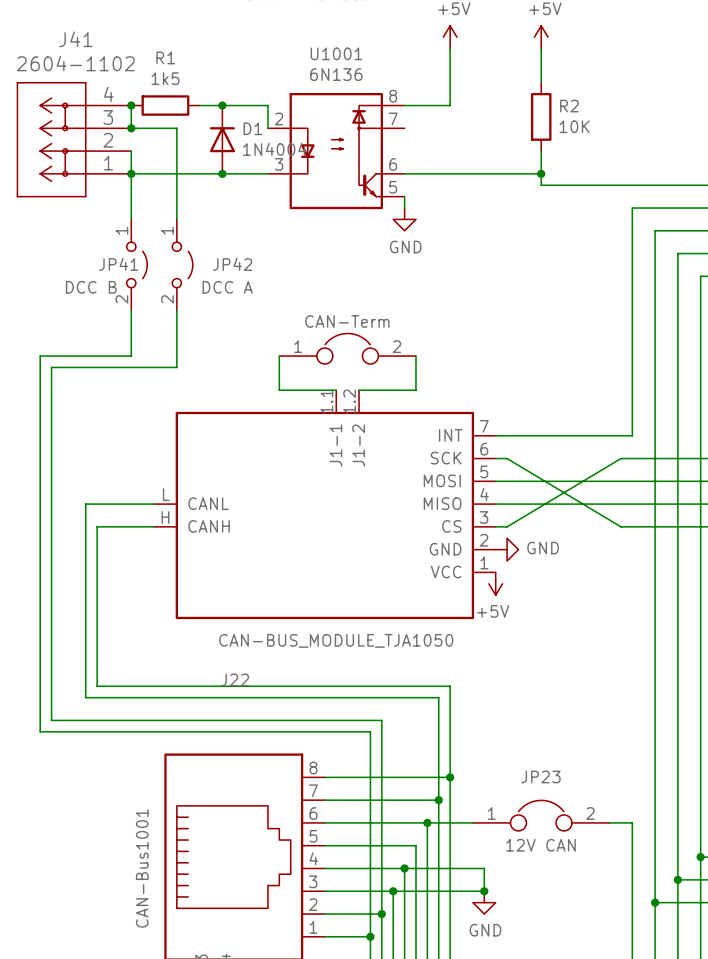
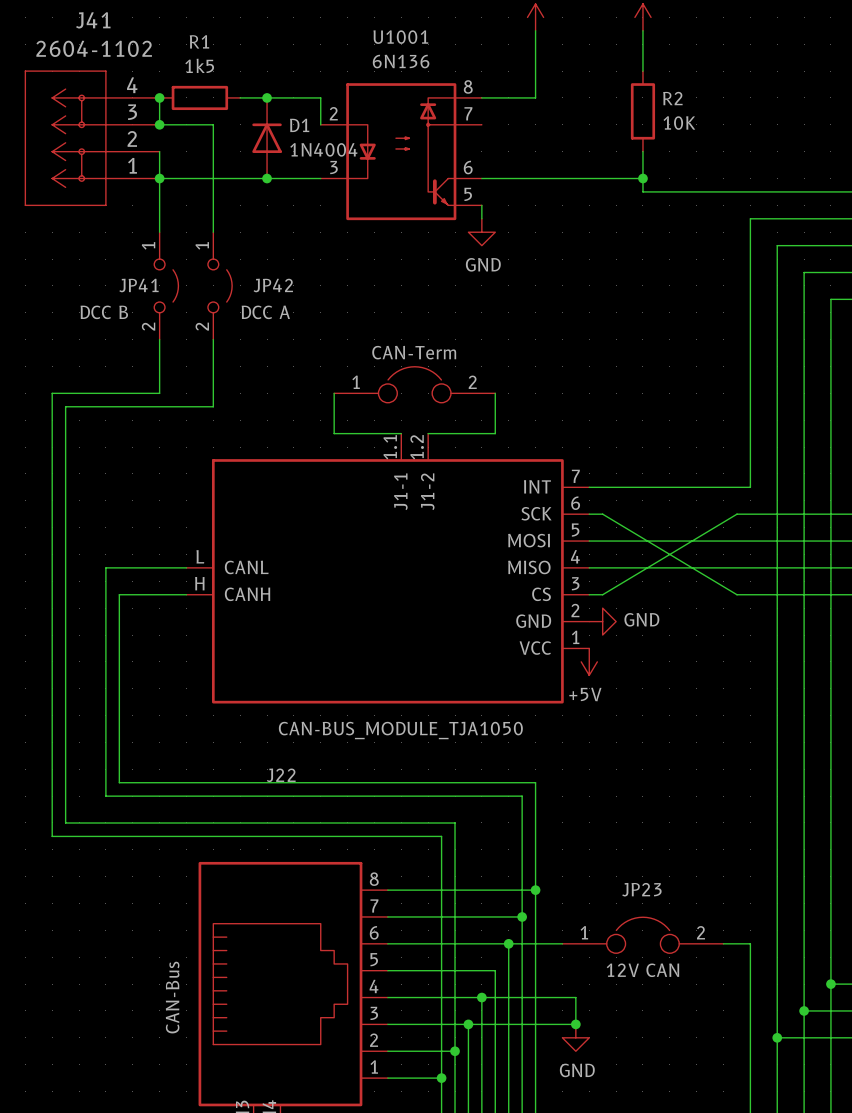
CAN-Bus1001 name: CAN-Bus1001 (142, 868) -> CAN-Bus (172, 997)

